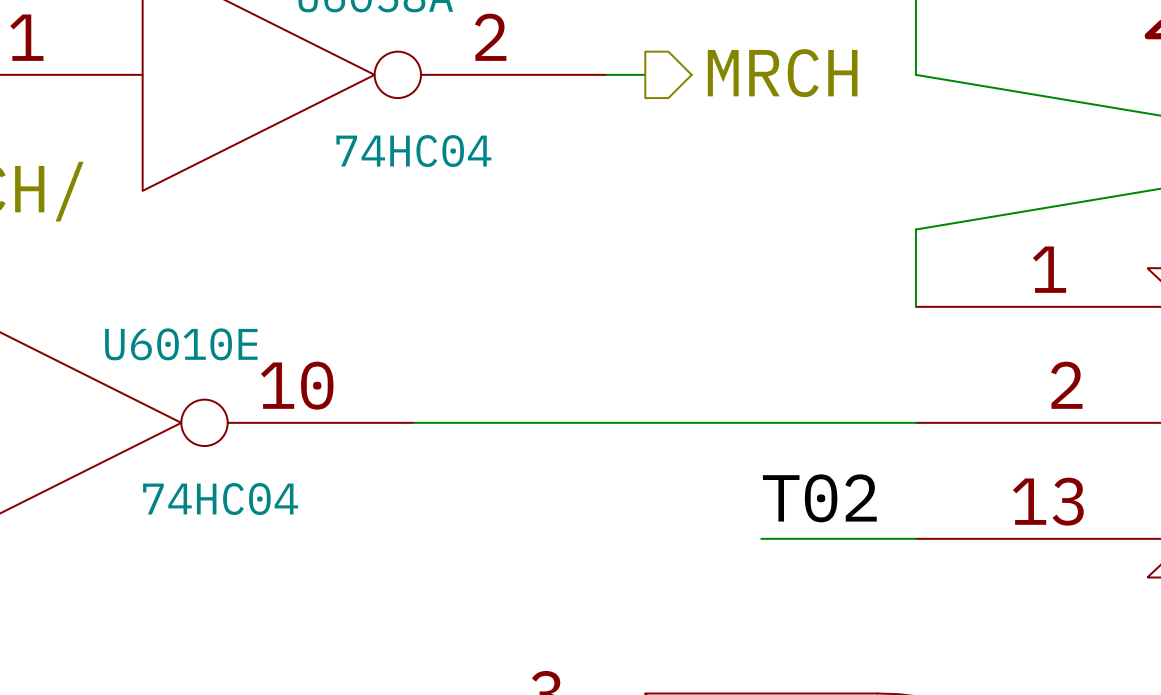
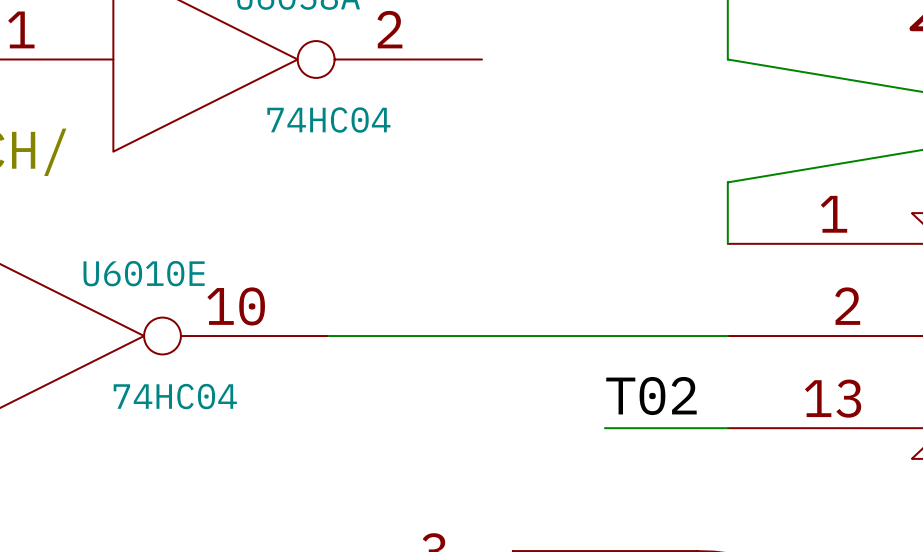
hierarchical label: MRCH (782, 73) -> none
wire: (606, 74) (645, 74) -> none

